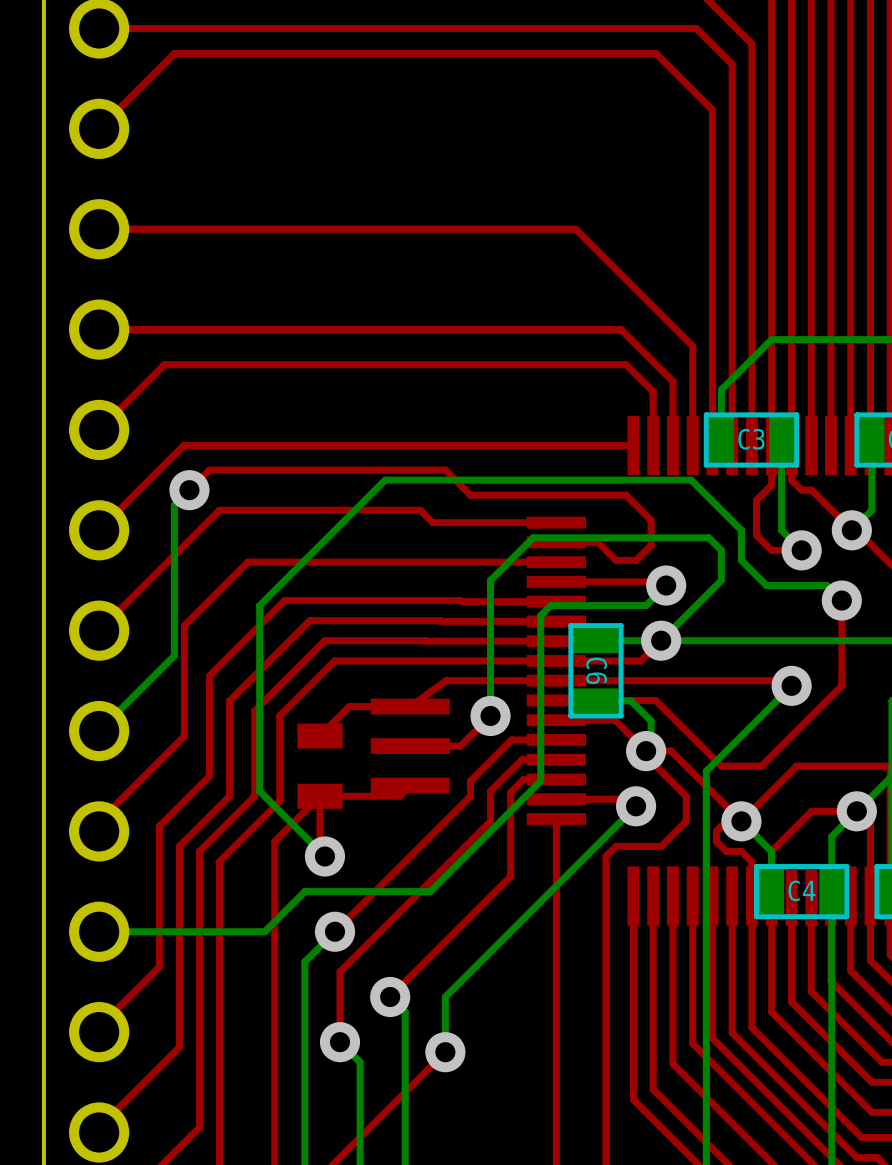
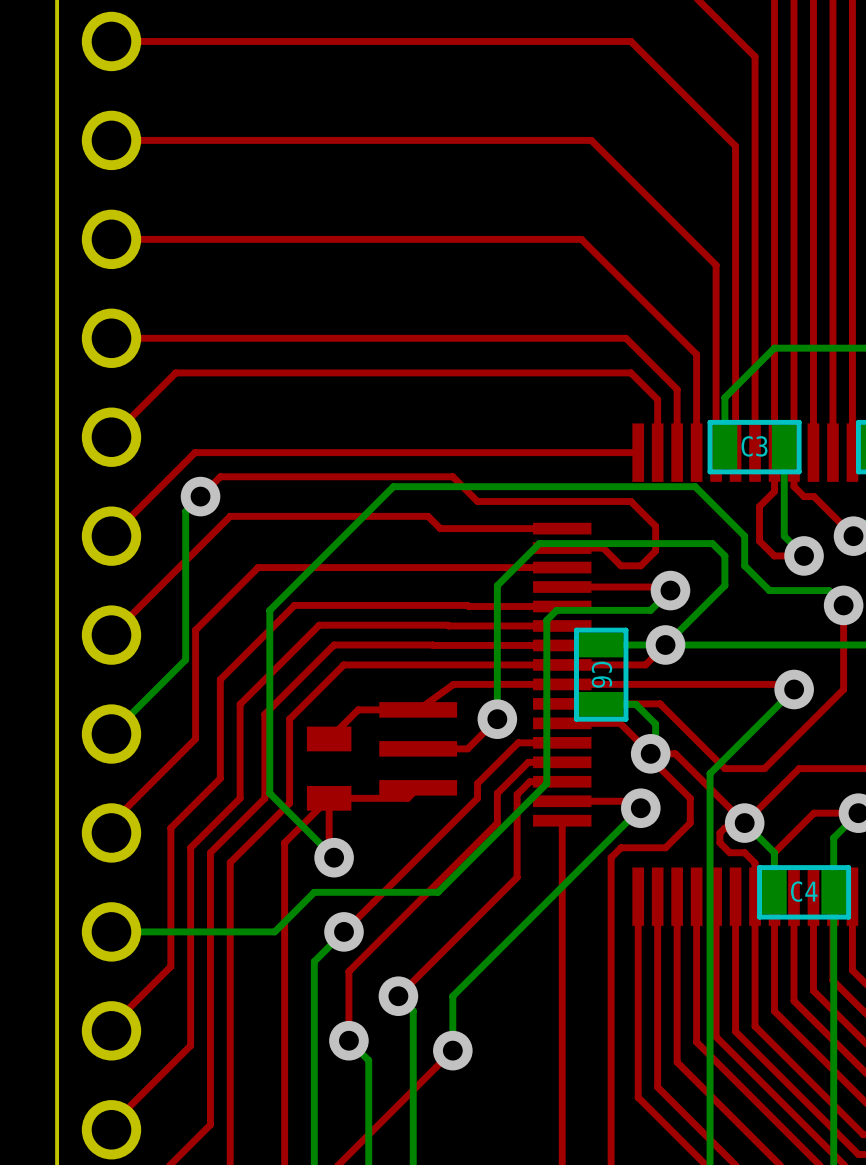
top track: (626, 28) (696, 28) (732, 64) (732, 134) -> (630, 41) (735, 146)
top track: (99, 128) (174, 53) (656, 53) (712, 109) (712, 255) -> (111, 140) (591, 140) (716, 265)

